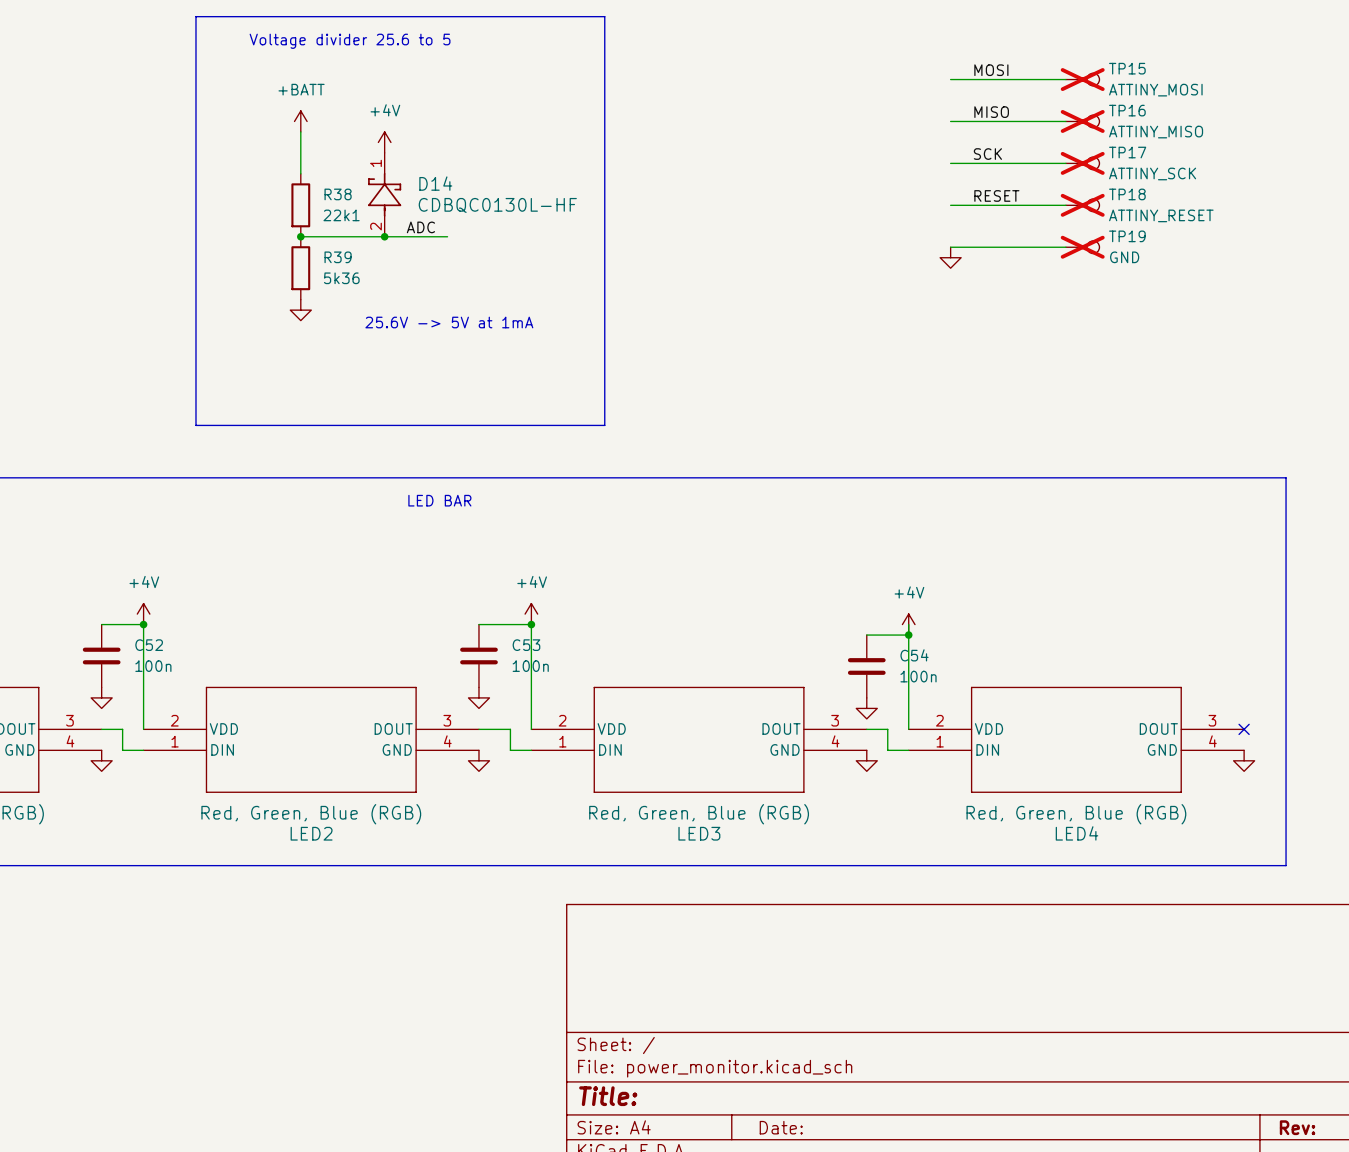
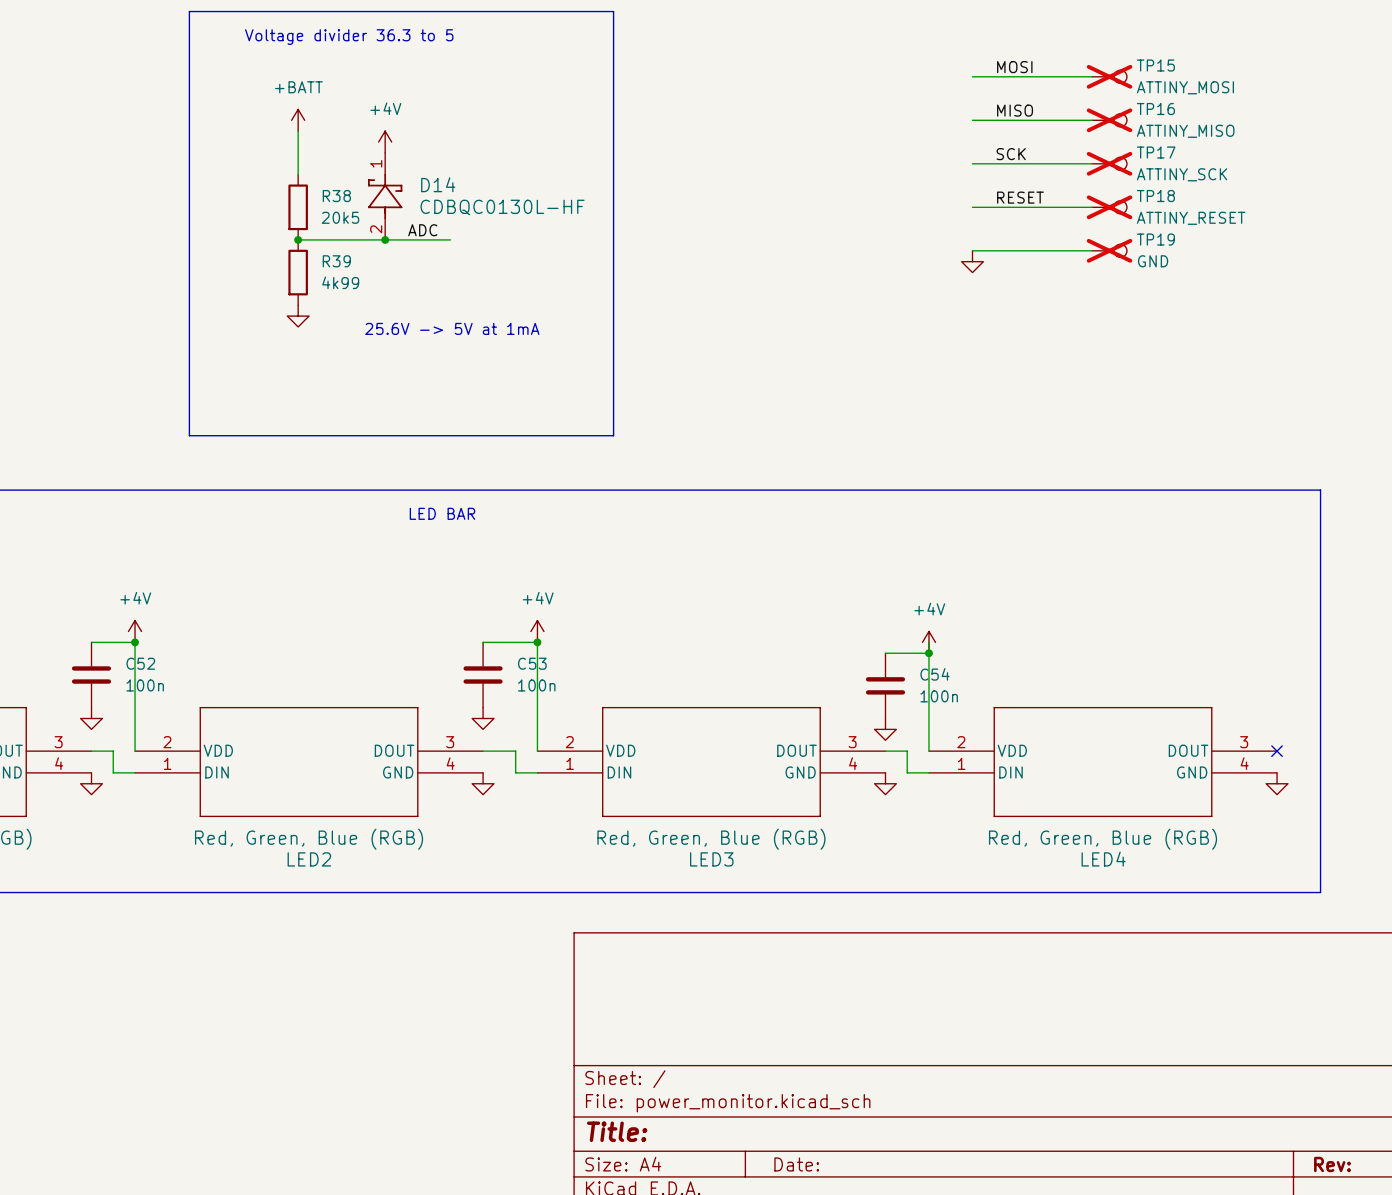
text: Voltage divider 25.6 to 5 (350, 41) -> Voltage divider 36.3 to 5 (349, 37)
R38 value: 22k1 (341, 215) -> 20k5 (340, 217)
R39 value: 5k36 (341, 278) -> 4k99 (340, 282)

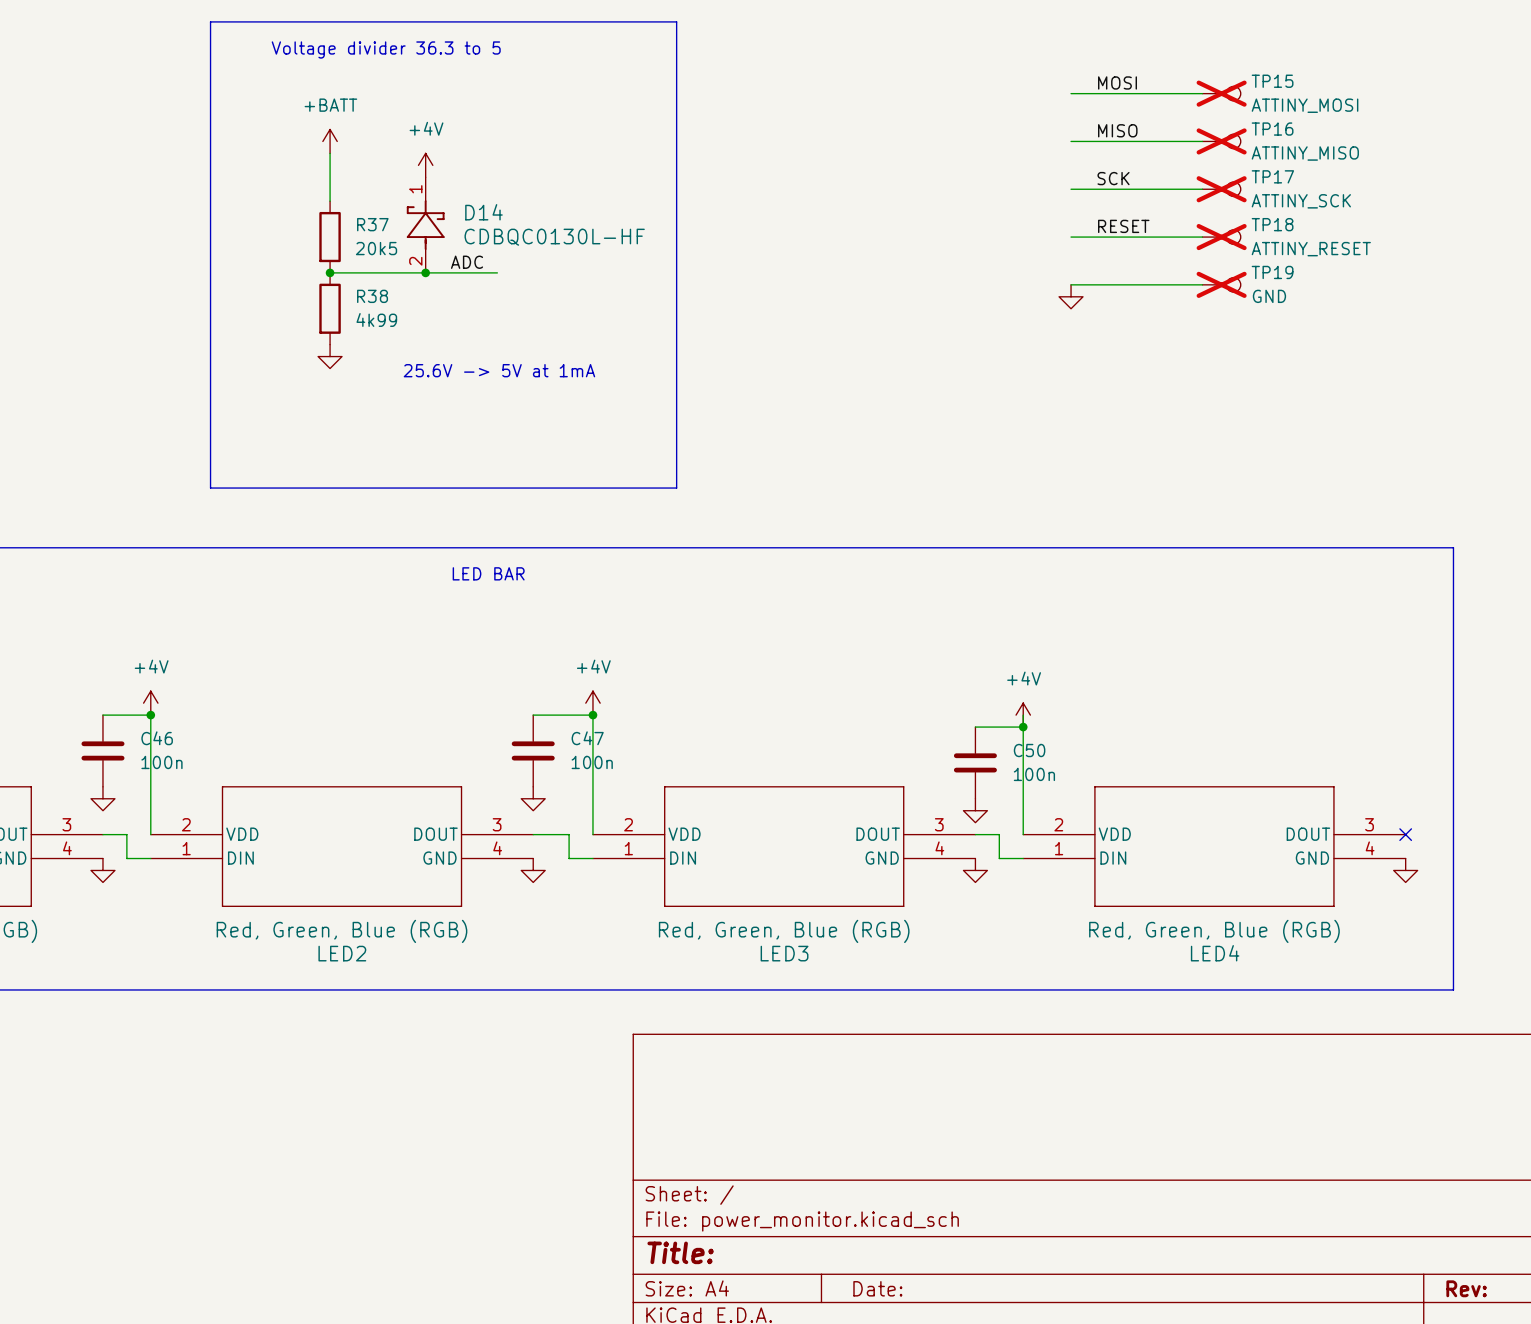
R38 name: R38 (336, 196) -> R37 (372, 224)
R39 name: R39 (336, 261) -> R38 (372, 296)
C52 name: C52 (140, 663) -> C46 (157, 738)
C53 name: C53 (532, 663) -> C47 (587, 738)
C54 name: C54 (935, 674) -> C50 (1029, 750)

